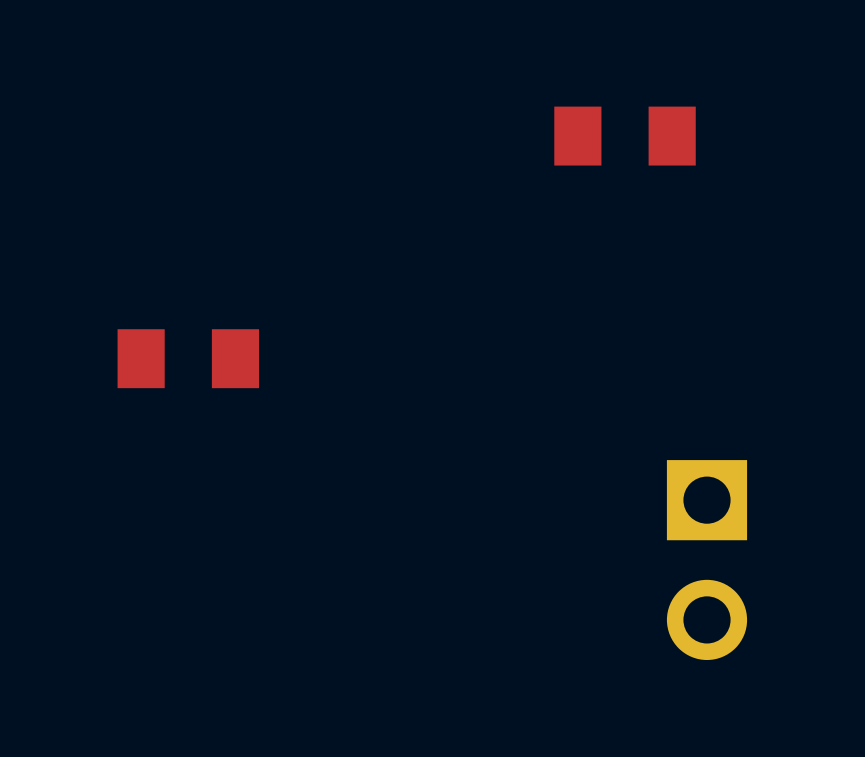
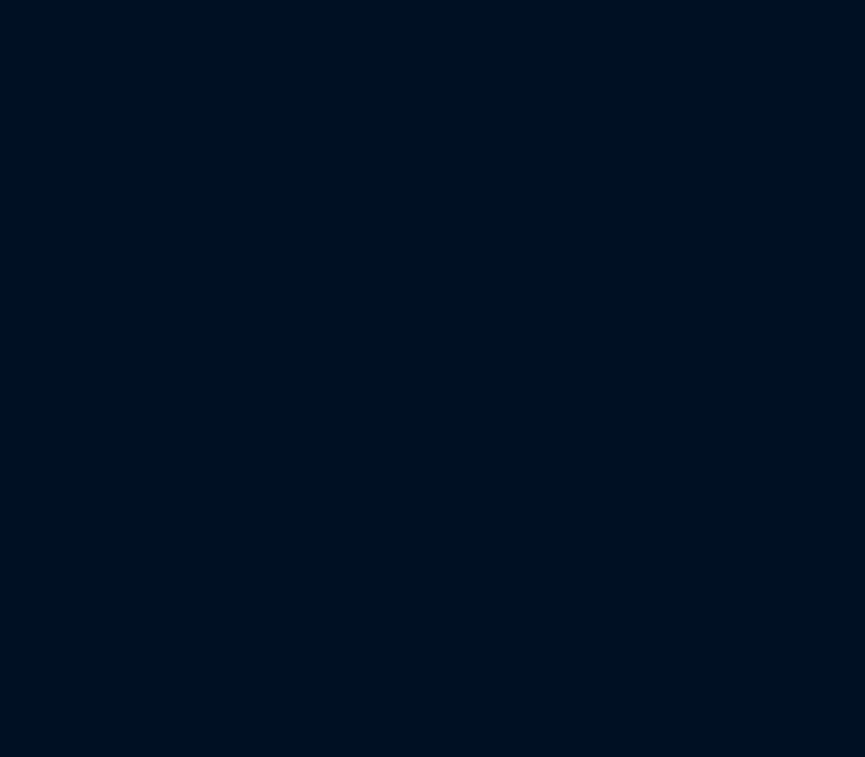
part: (625, 136) -> none
part: (188, 358) -> none
part: (707, 560) -> none

